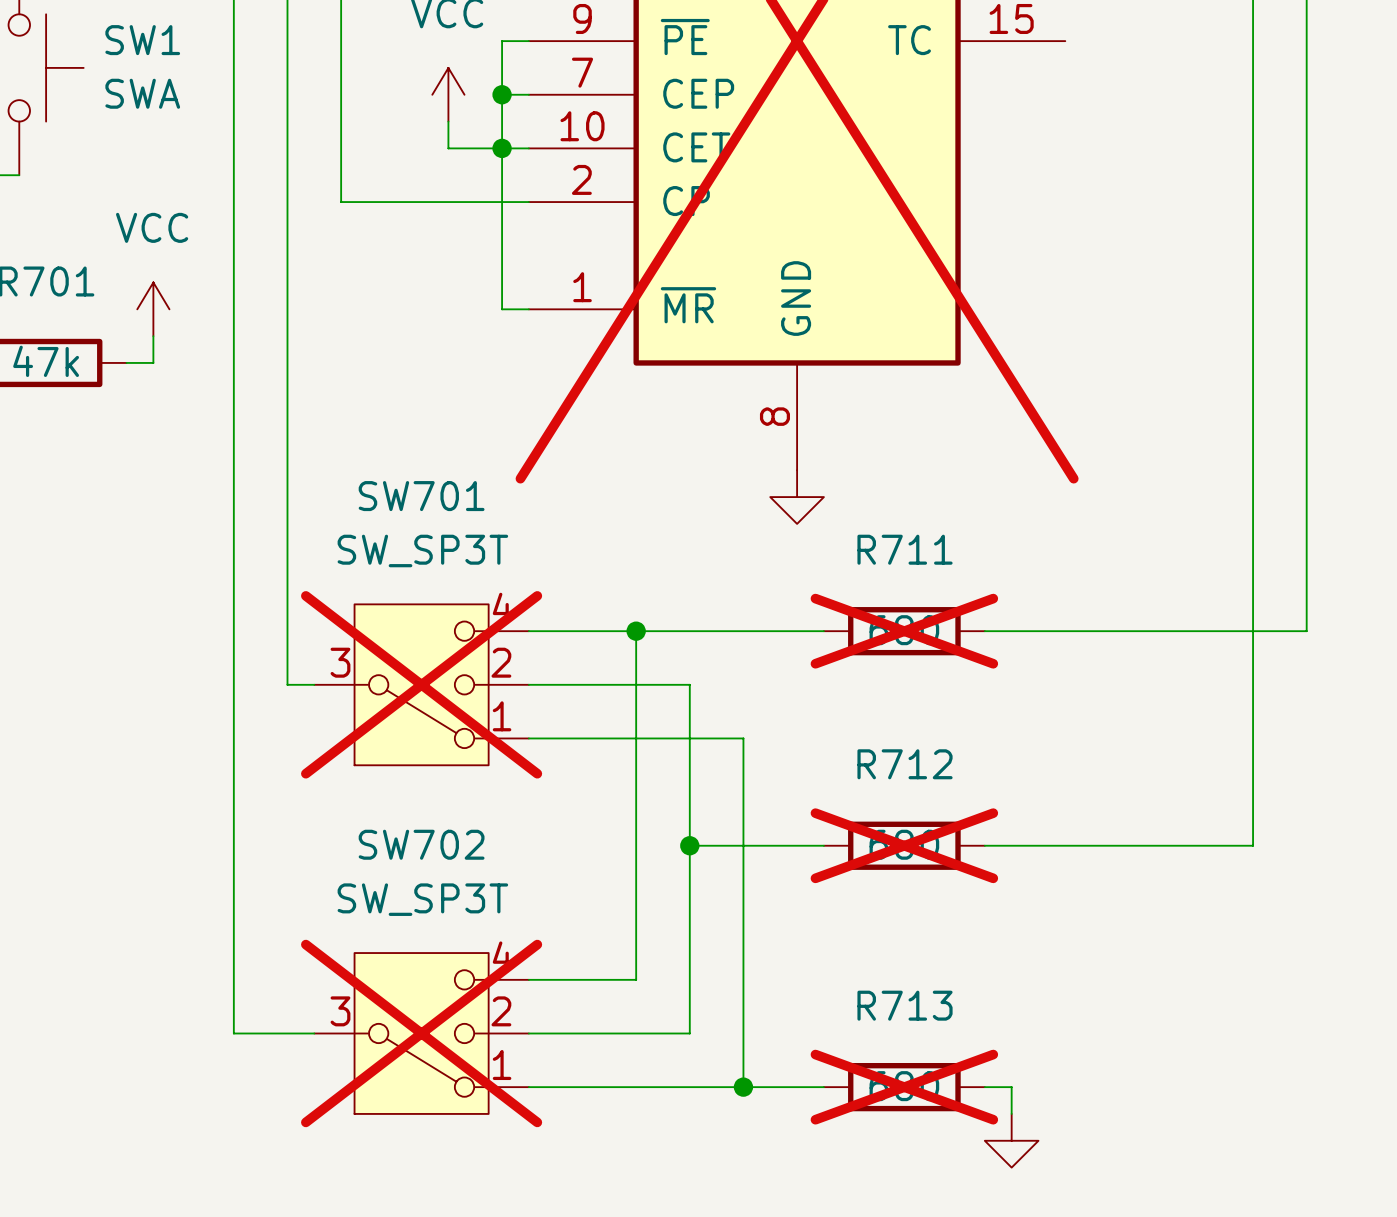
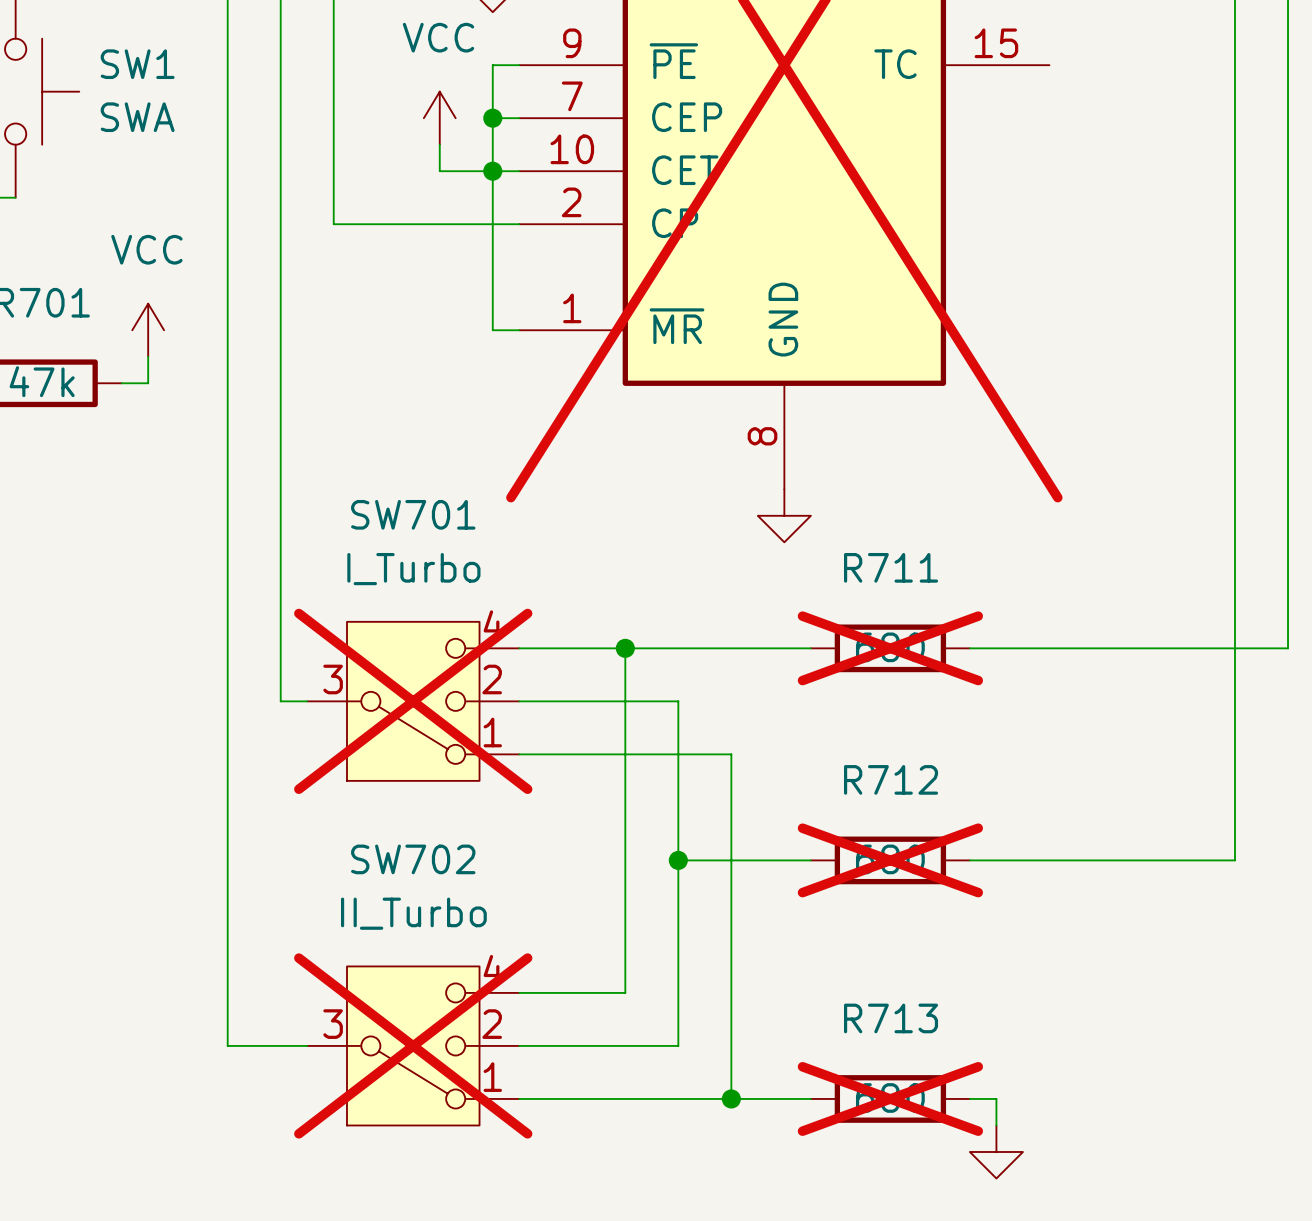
SW701 value: SW_SP3T (422, 550) -> I_Turbo (413, 569)
SW702 value: SW_SP3T (422, 899) -> II_Turbo (413, 913)

